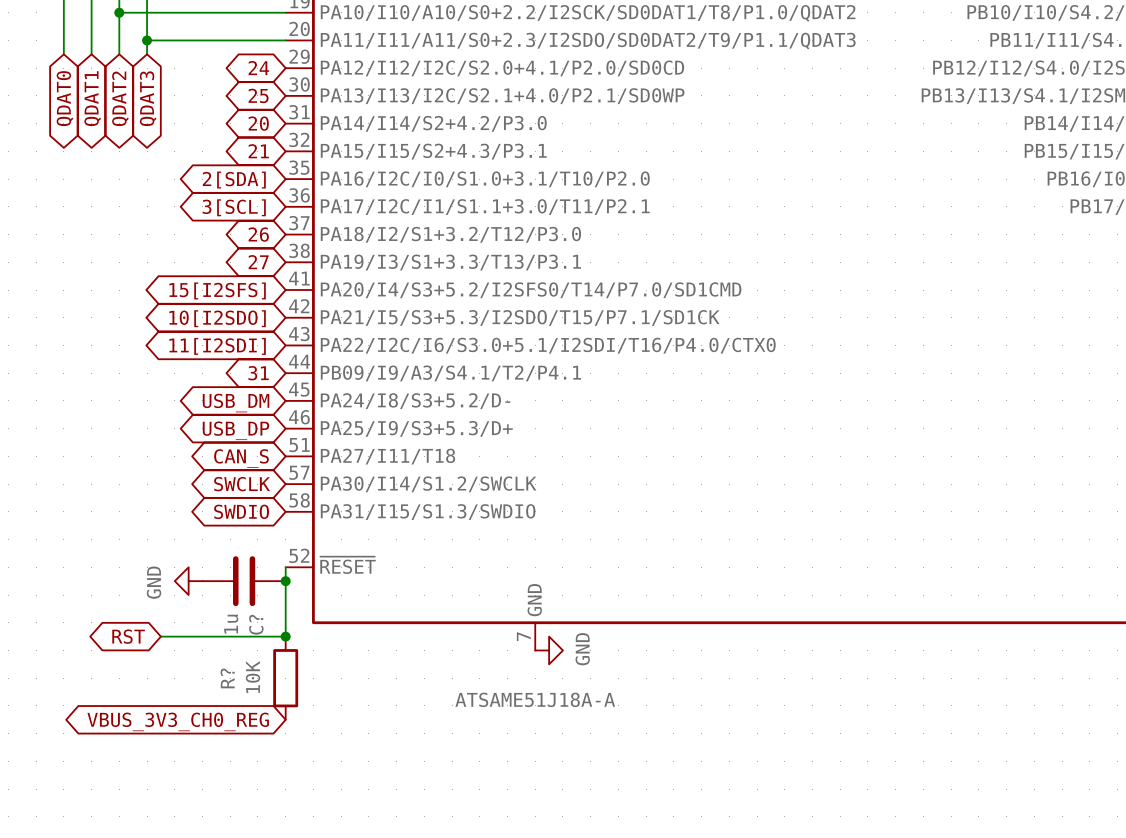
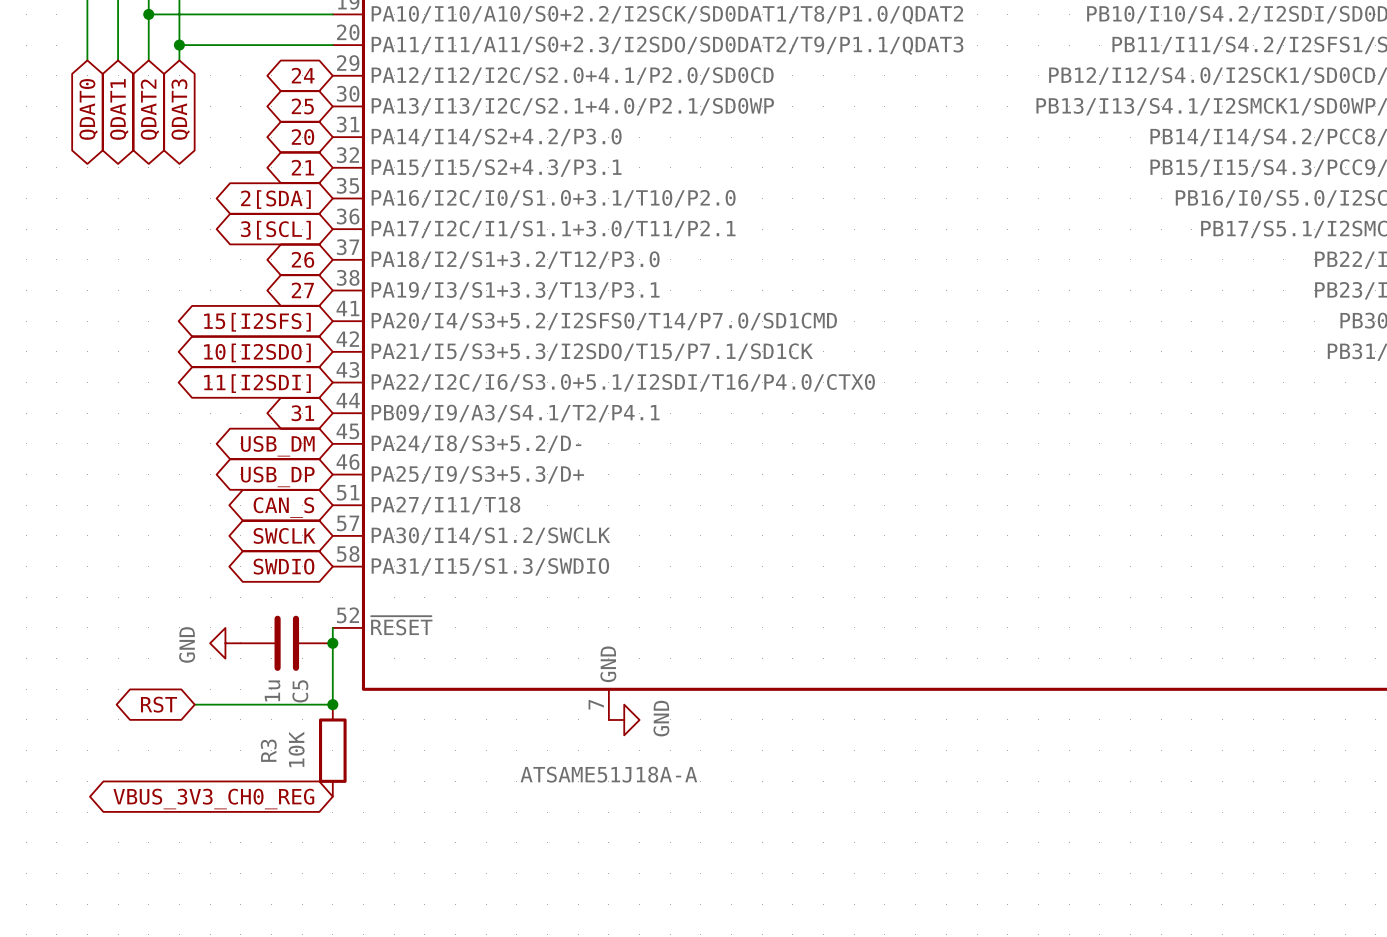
C? name: C? (256, 624) -> C5 (300, 691)
R? name: R? (227, 678) -> R3 (268, 750)

